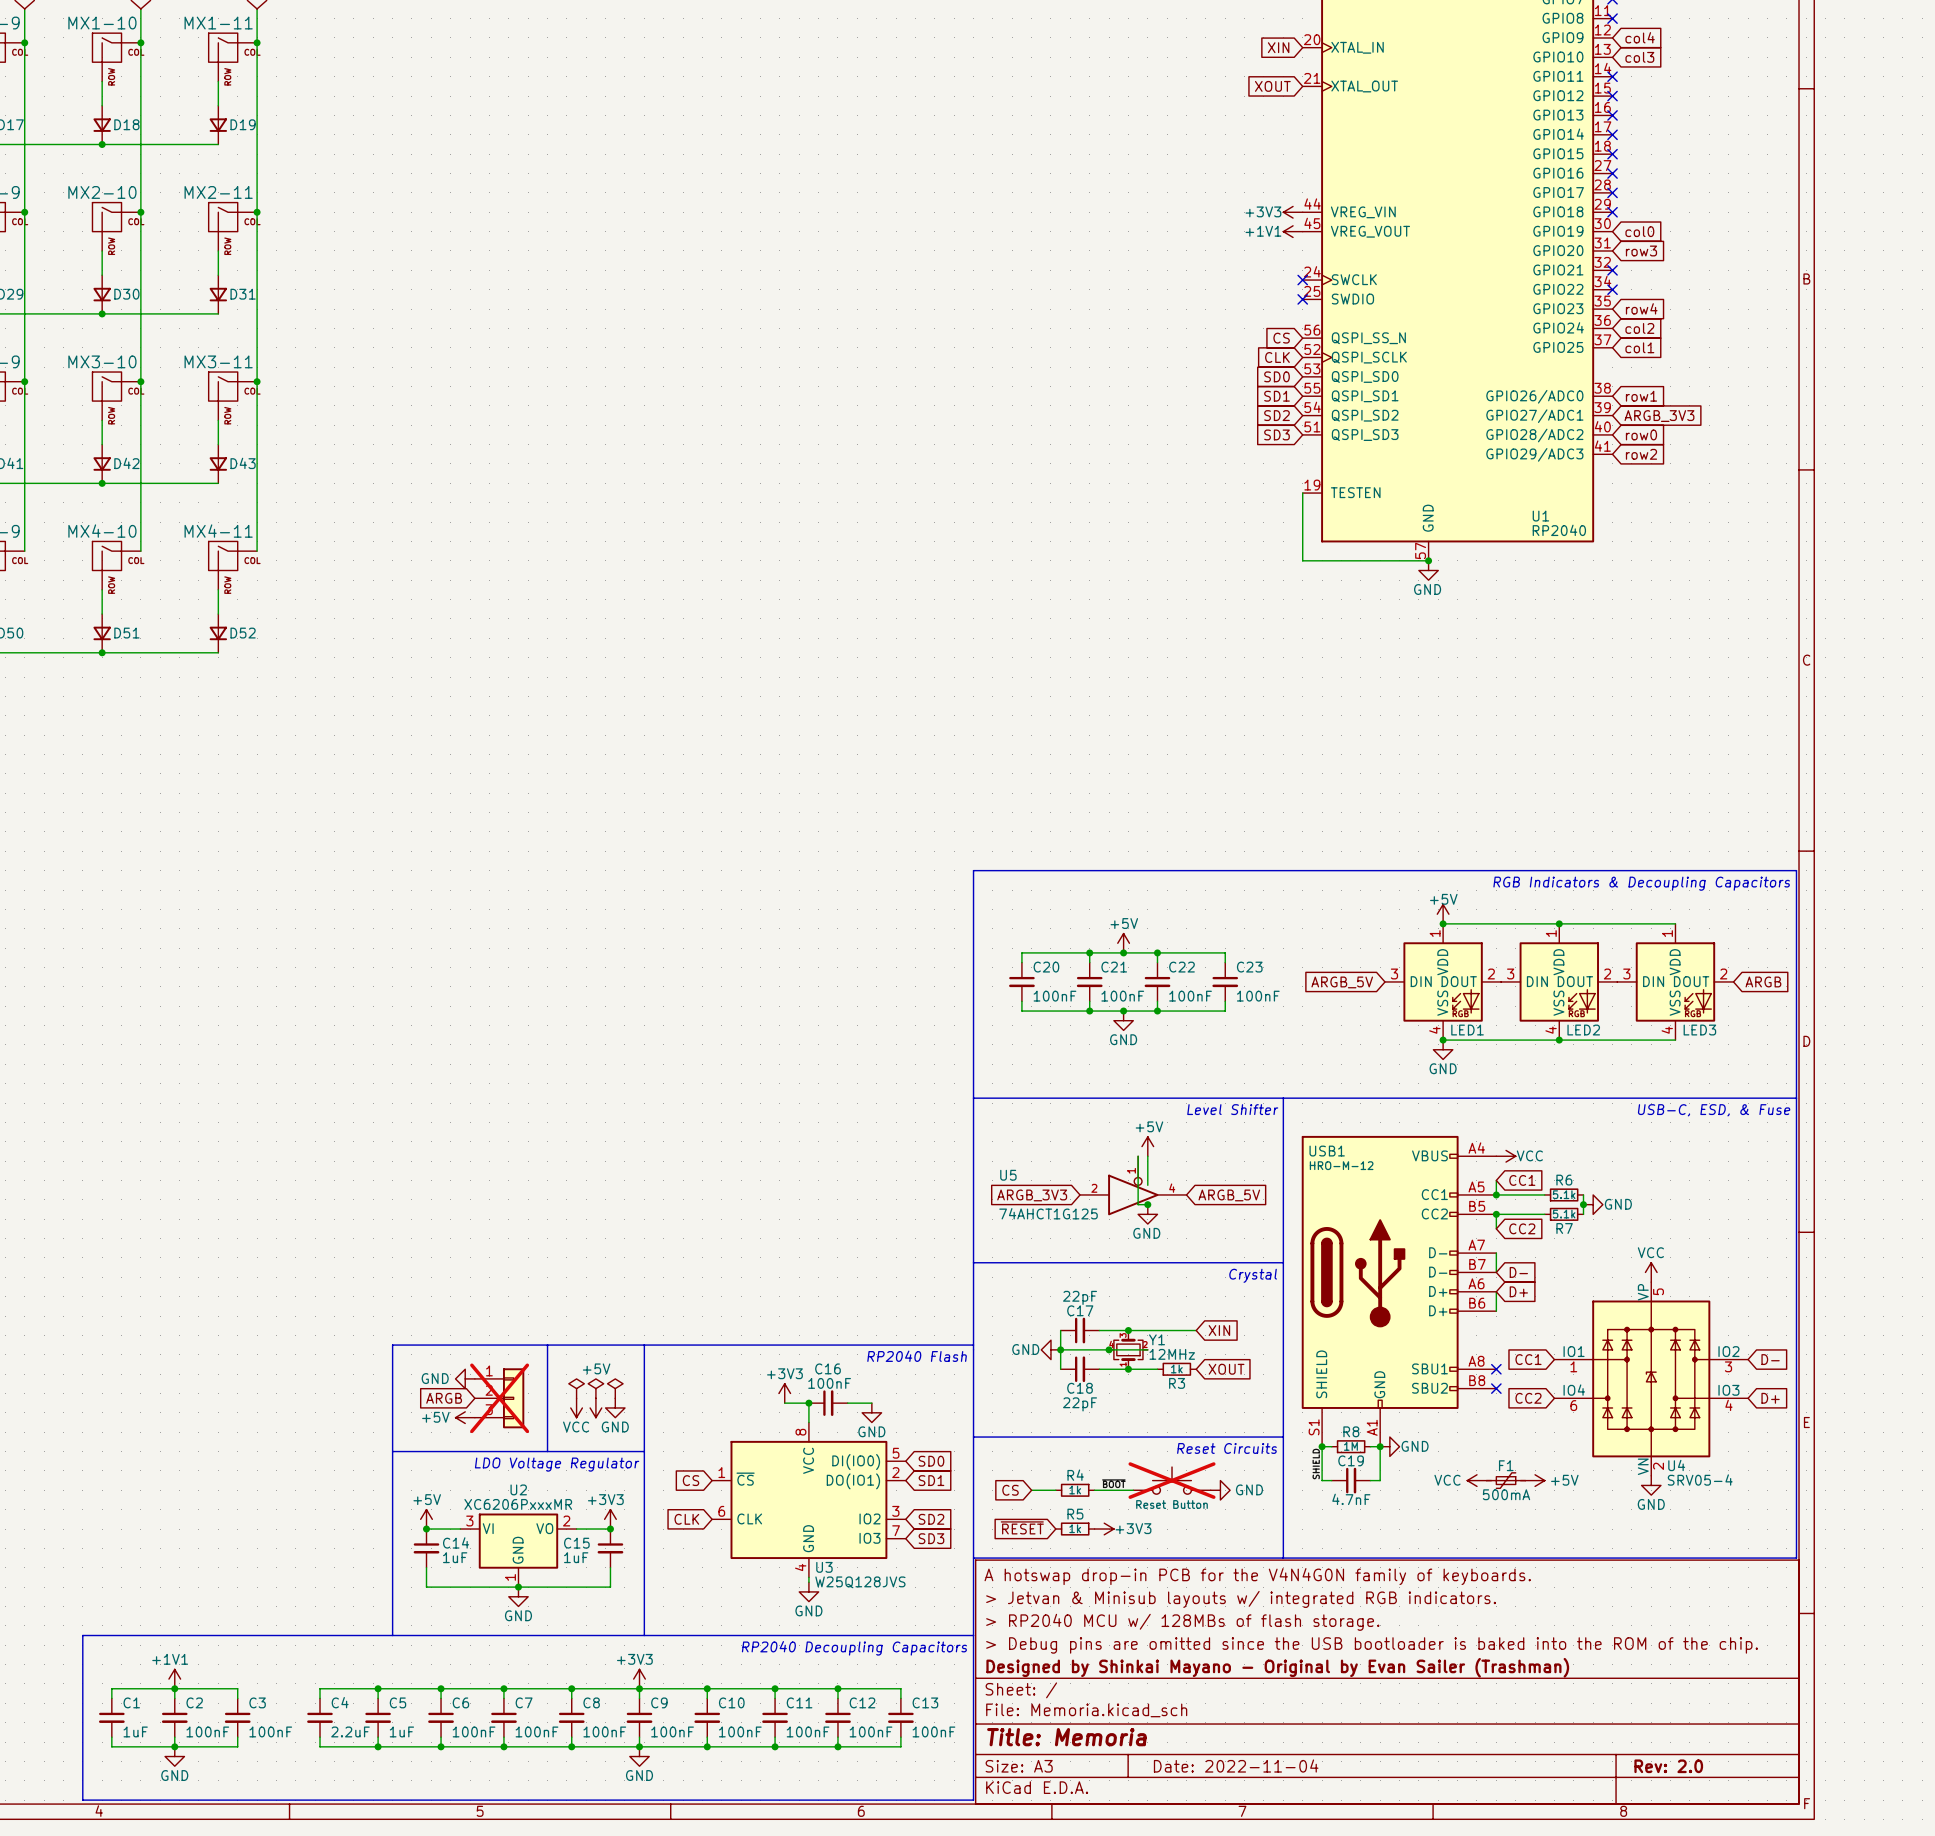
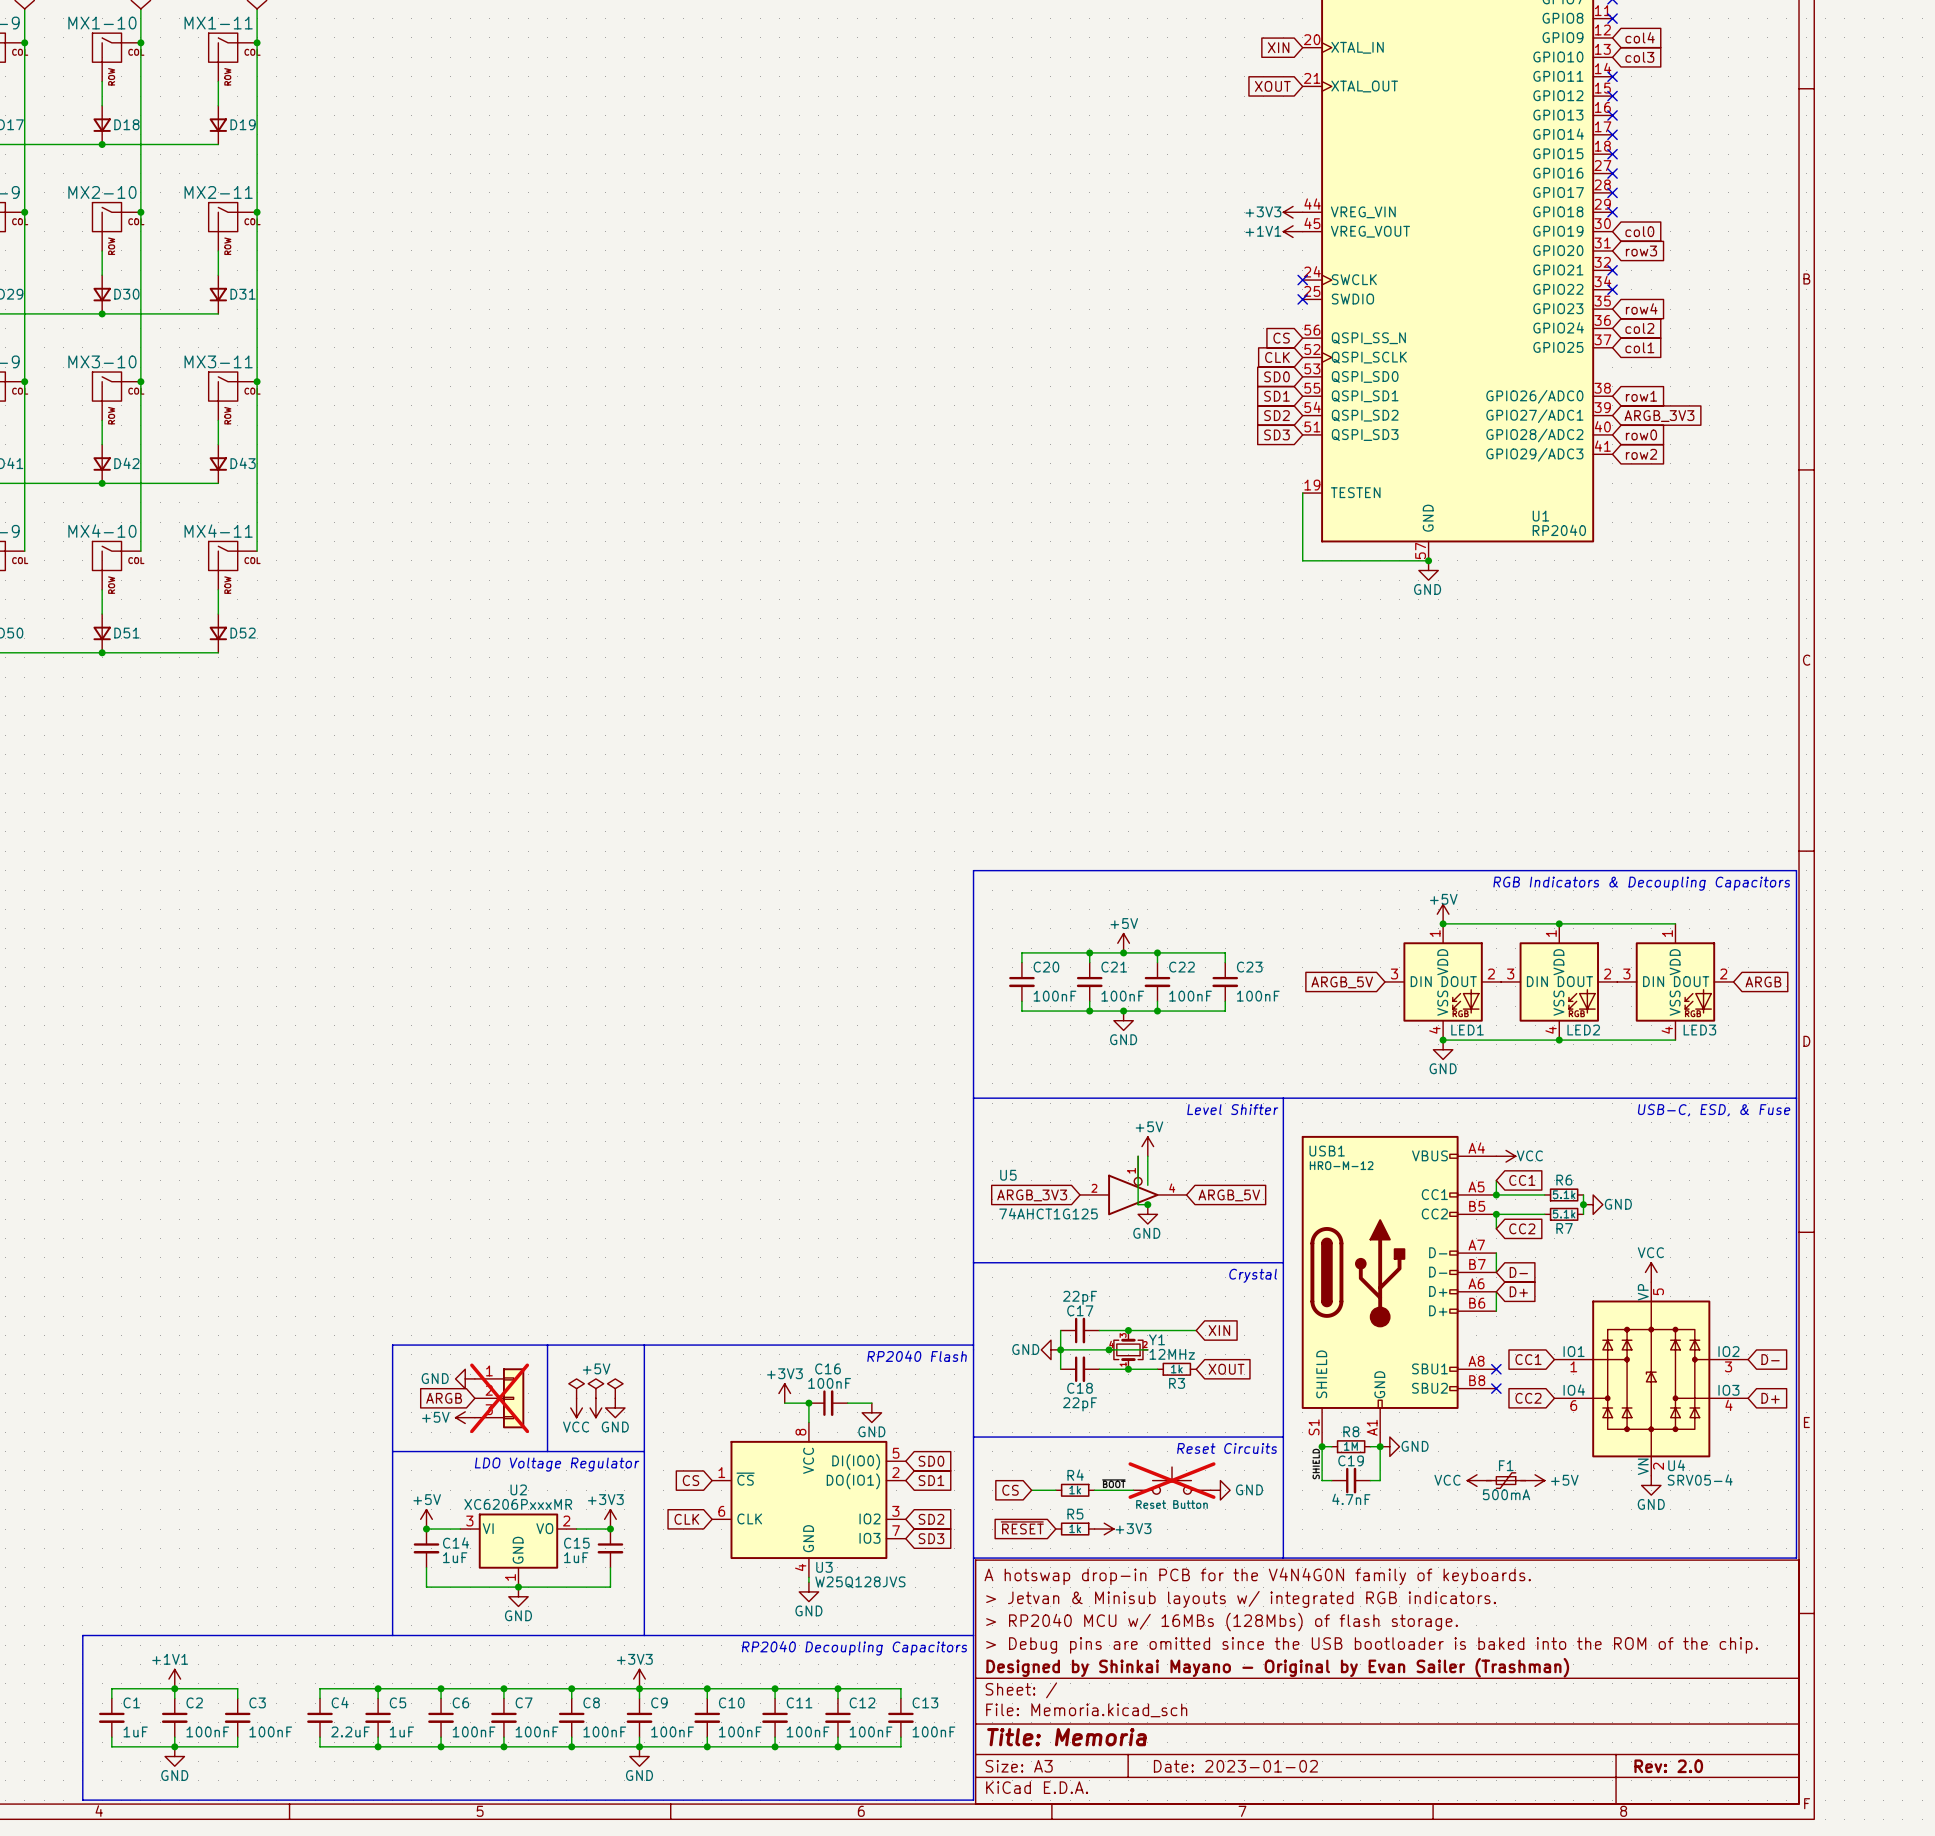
title block: > RP2040 MCU w/ 128MBs of flash storage. (1182, 1622) -> > RP2040 MCU w/ 16MBs (128Mbs) of flash storage. (1222, 1622)
title block: Date: 2022-11-04 (1236, 1766) -> Date: 2023-01-02 (1235, 1766)

